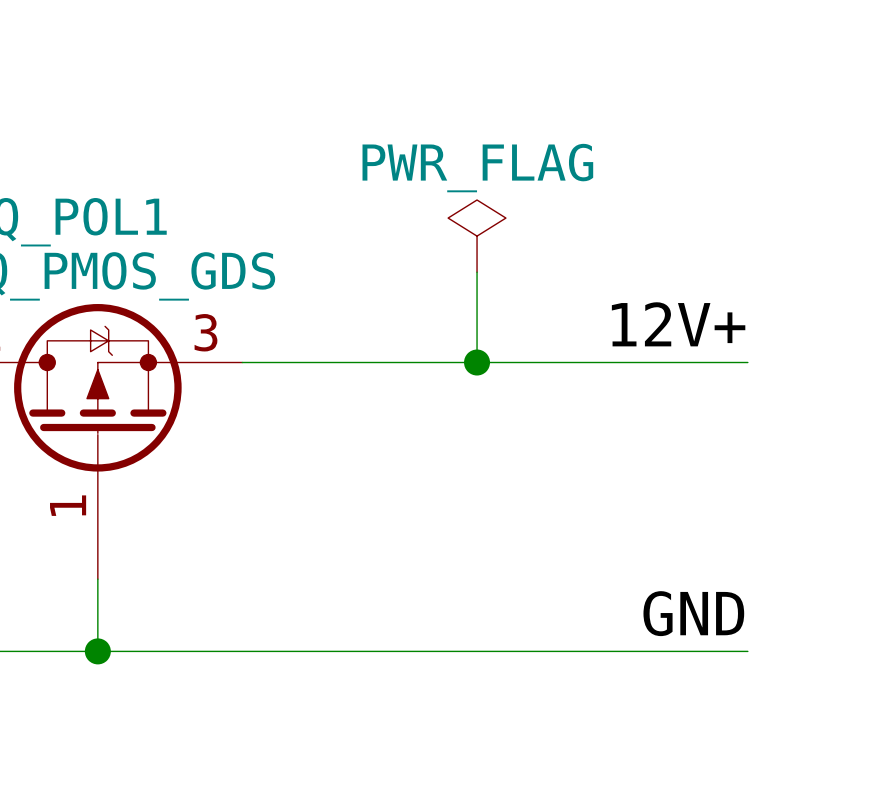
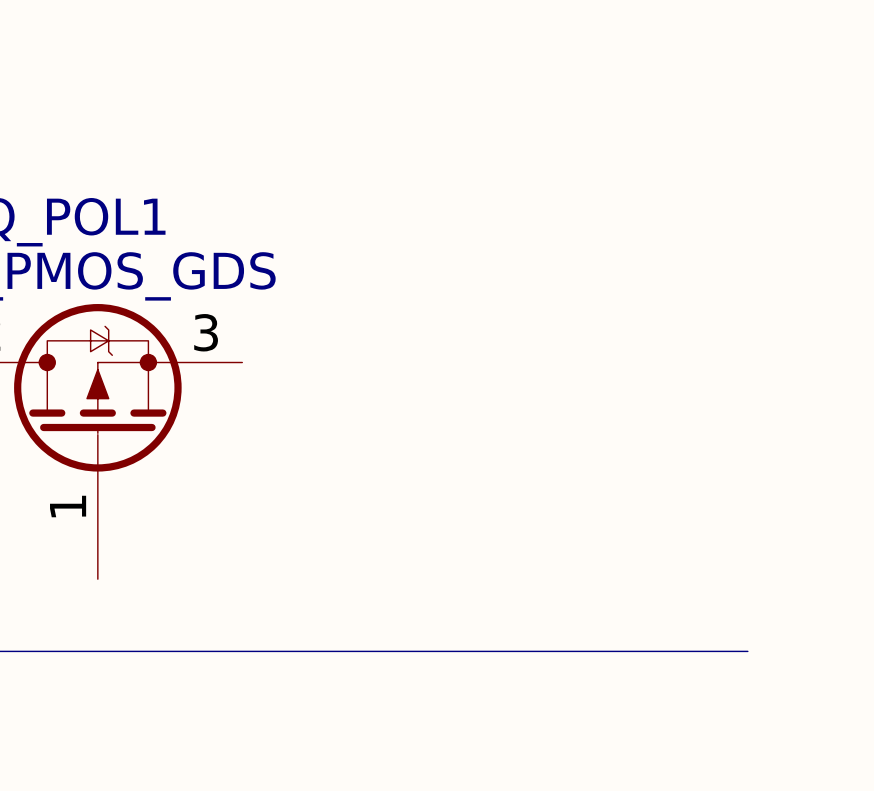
power symbol: PWR_FLAG (477, 236) -> none
wire: (477, 272) (477, 362) -> none
label: 12V+ (678, 324) -> none
wire: (242, 362) (747, 362) -> none
junction: (477, 362) -> none
wire: (97, 579) (97, 651) -> none
label: GND (693, 613) -> none
junction: (97, 651) -> none

